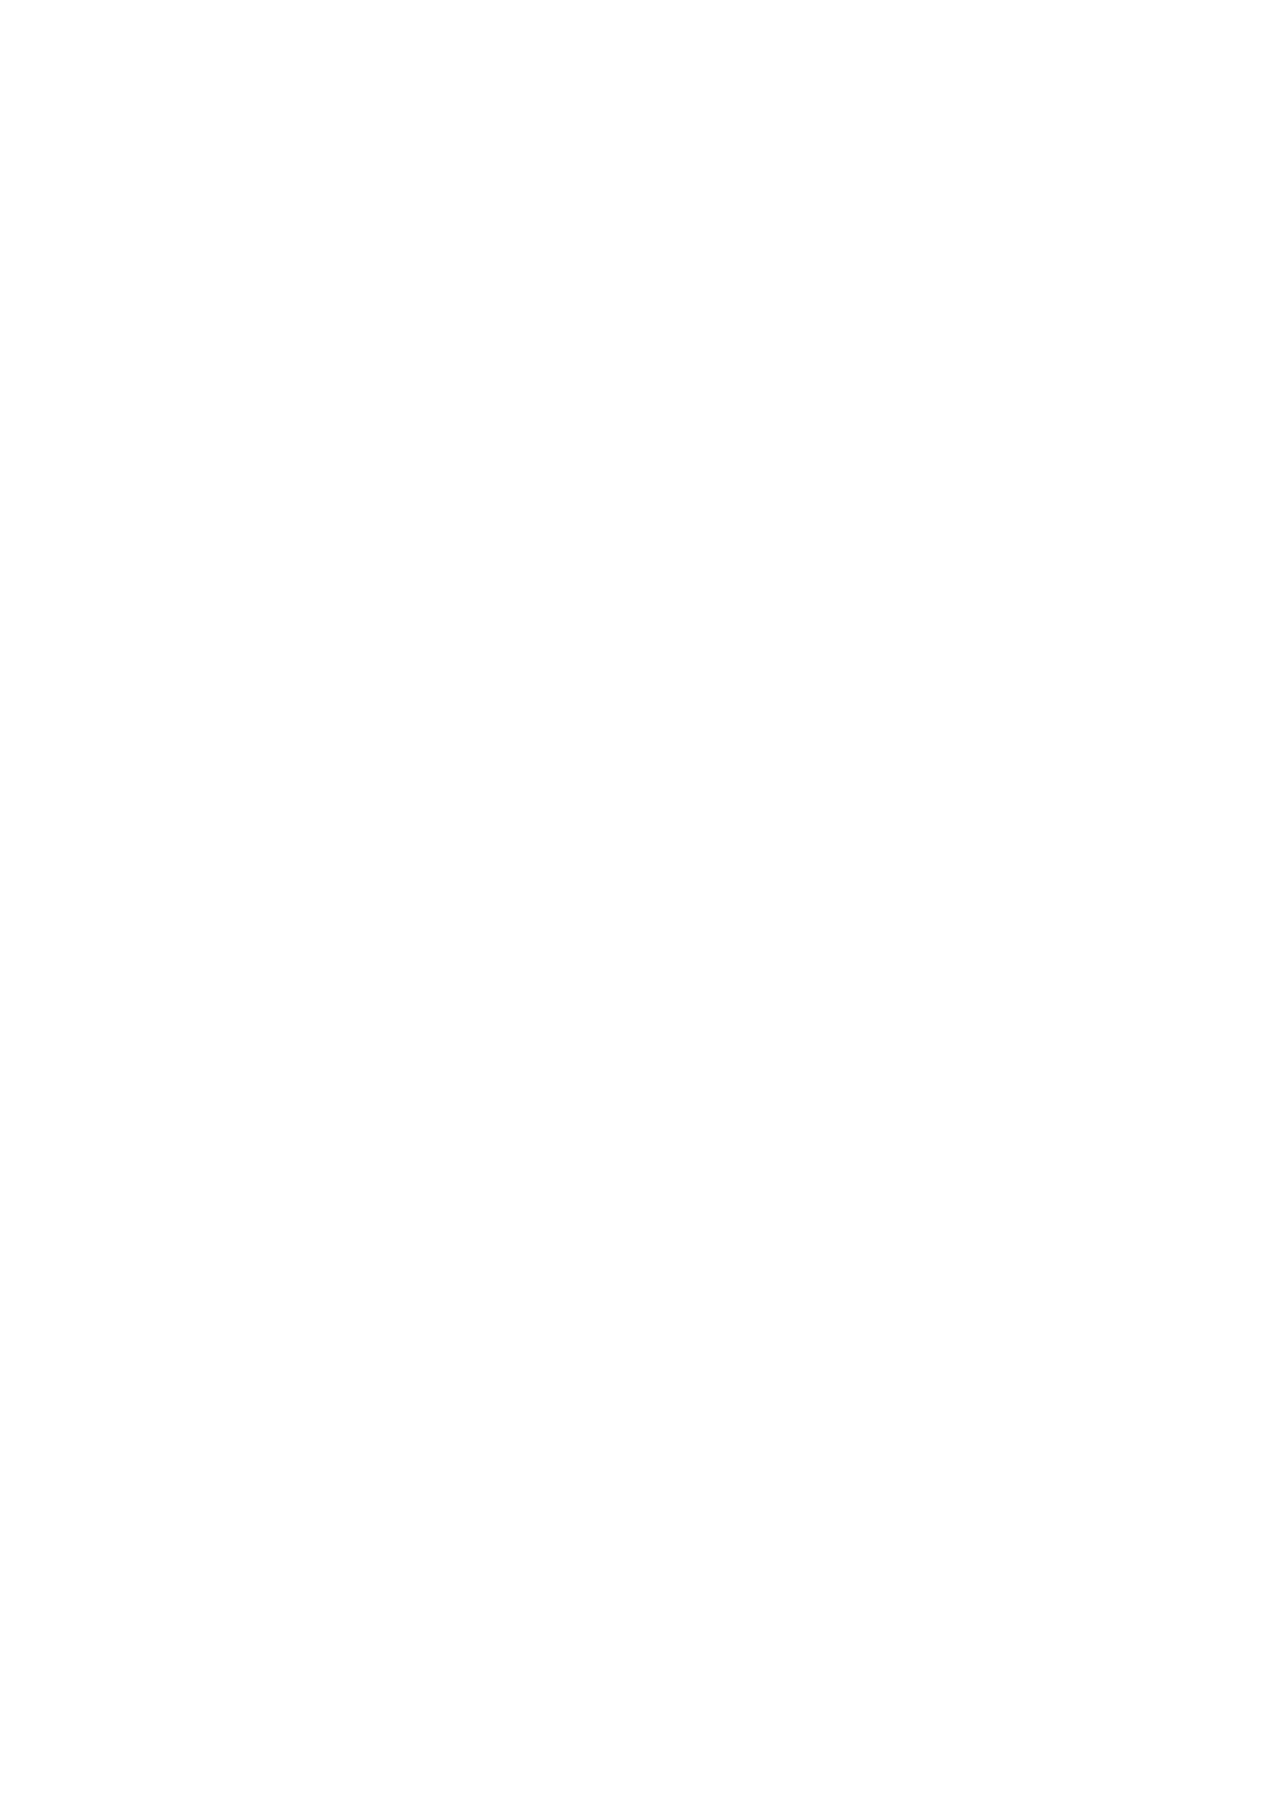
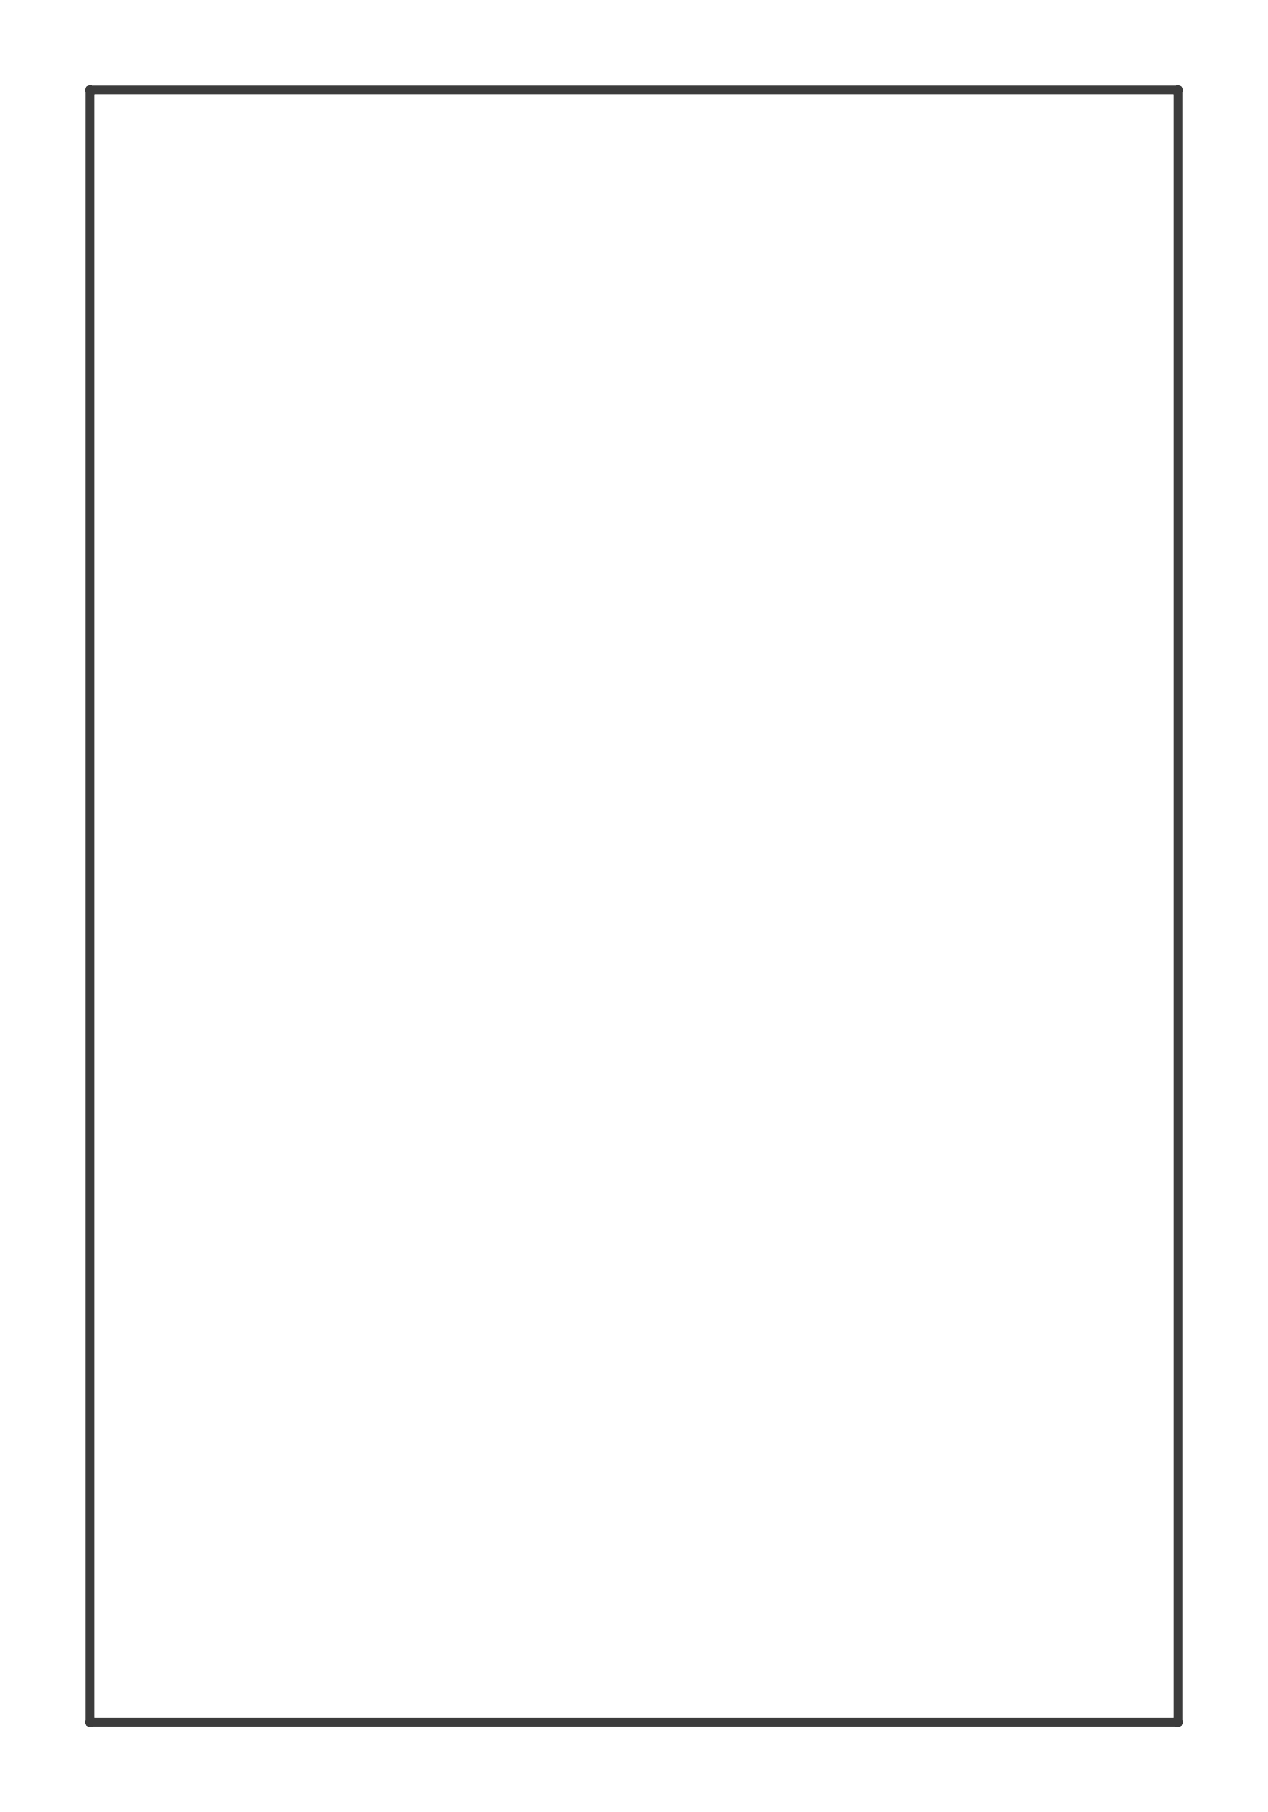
line: none -> (1178, 89) (89, 89) (89, 1722) (1178, 1722) (1178, 89)

